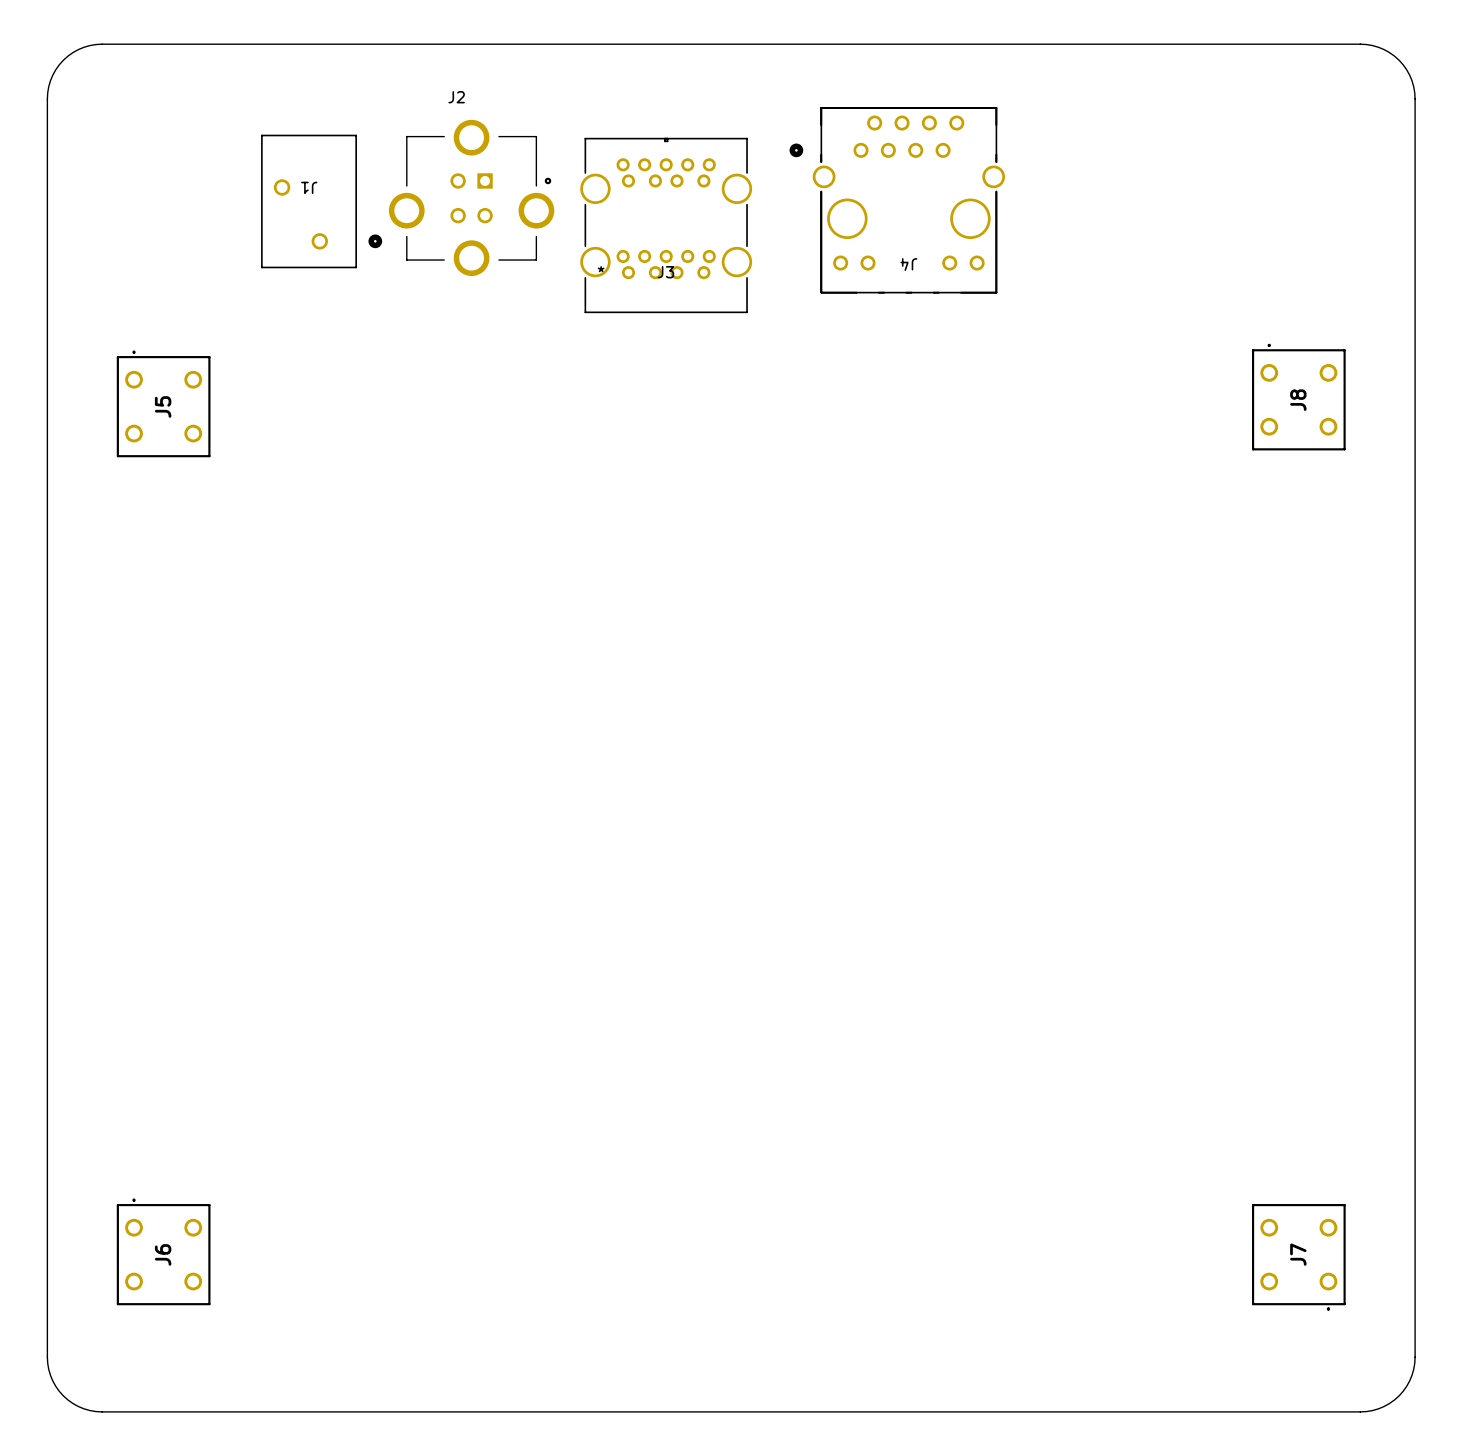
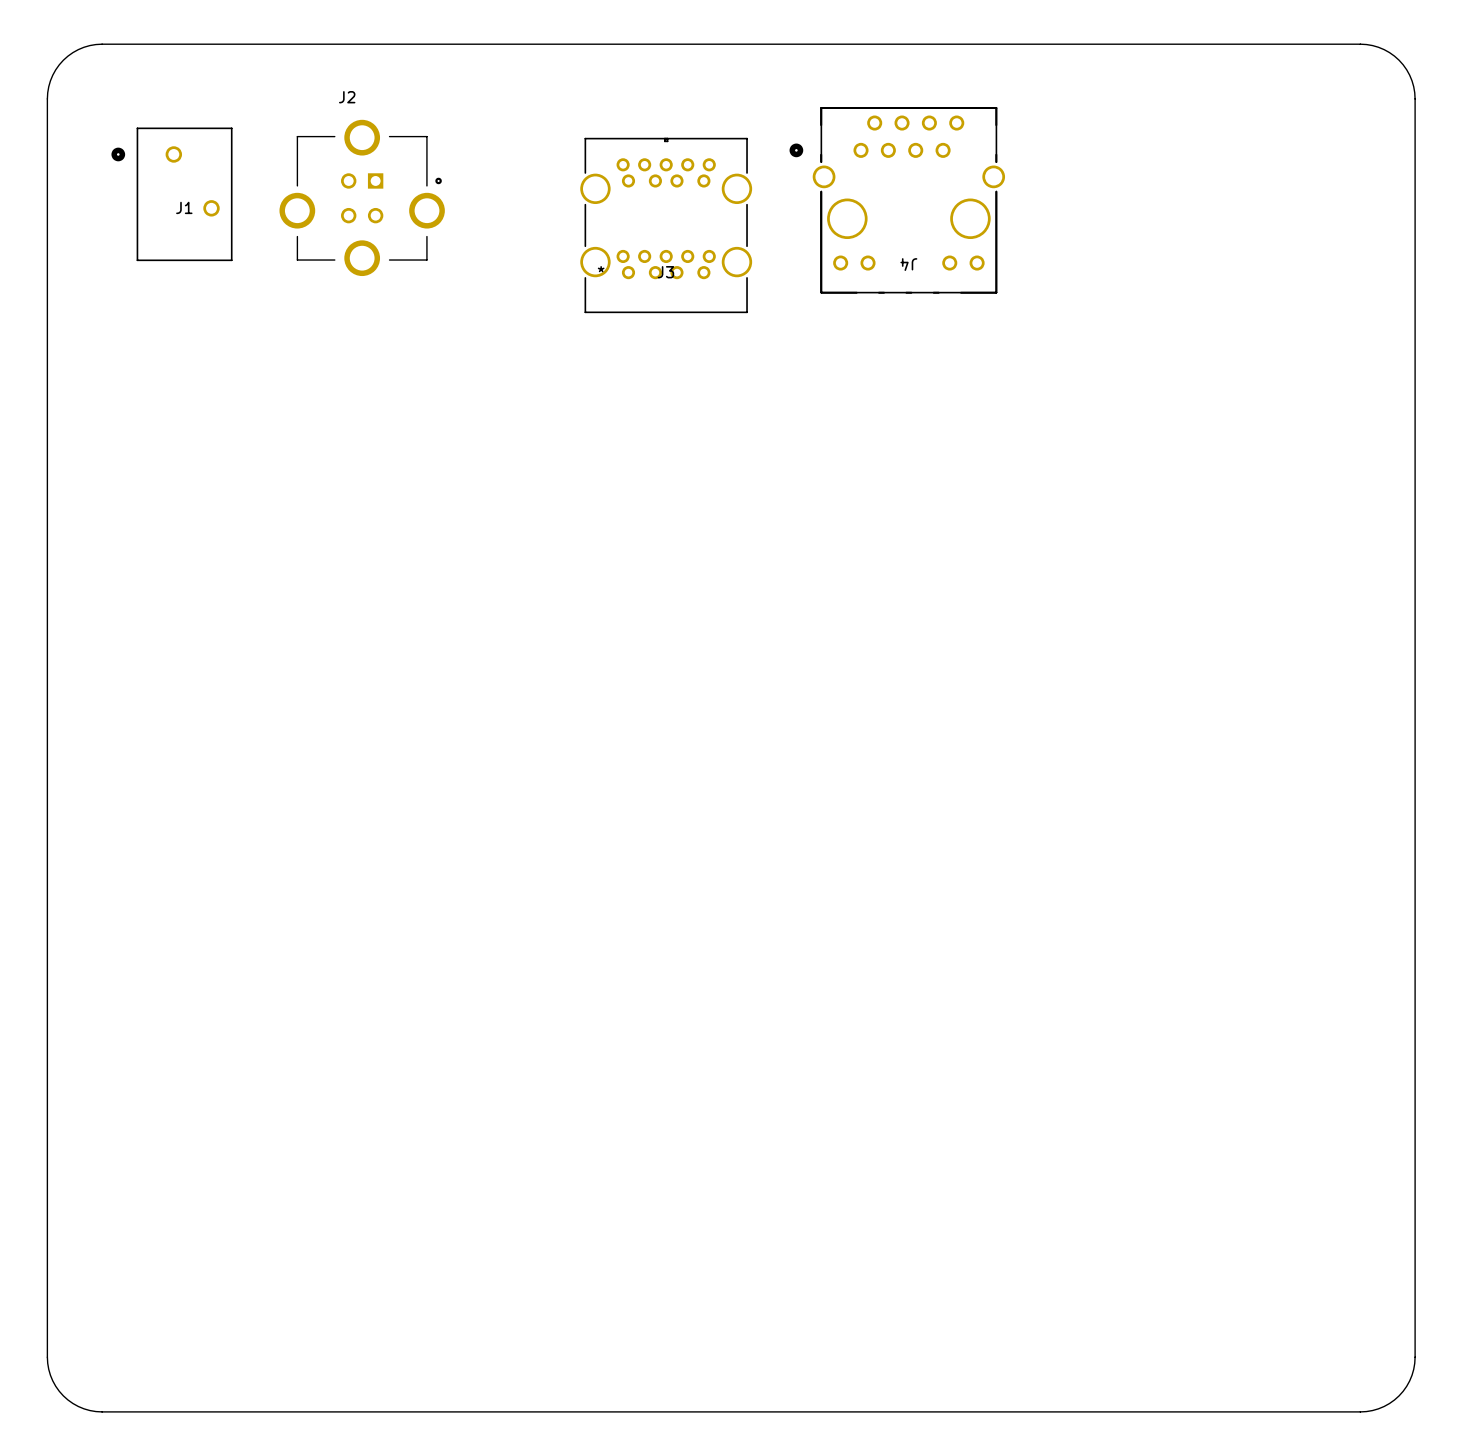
J2 position: (471, 197) -> (362, 197)
J1 rotation: 0° (321, 201) -> 180° (172, 194)
J1 position: (321, 201) -> (172, 194)
J8: (1298, 397) -> none
J5: (163, 403) -> none
J6: (163, 1251) -> none
J7: (1298, 1257) -> none

